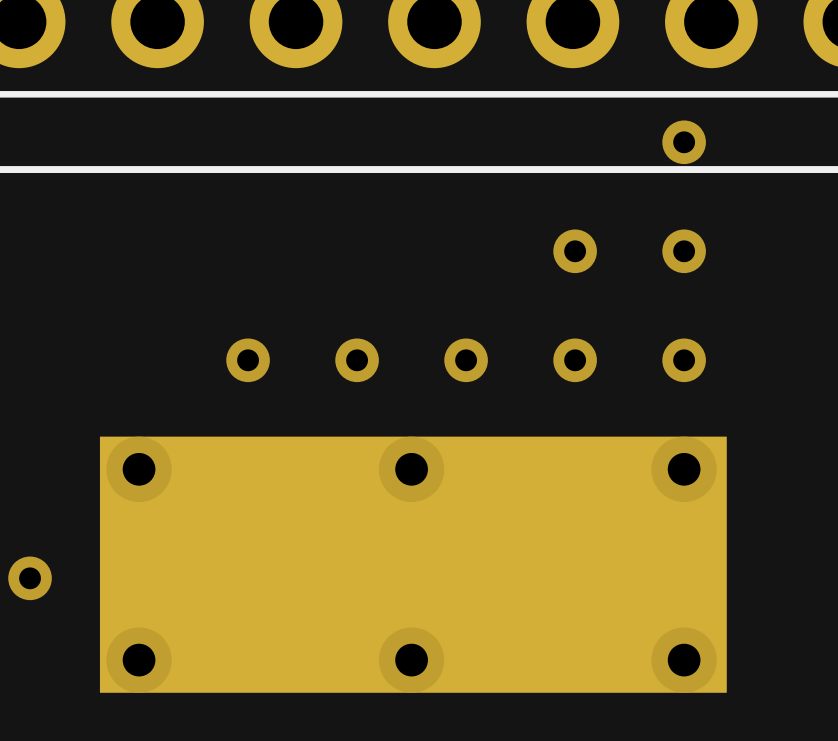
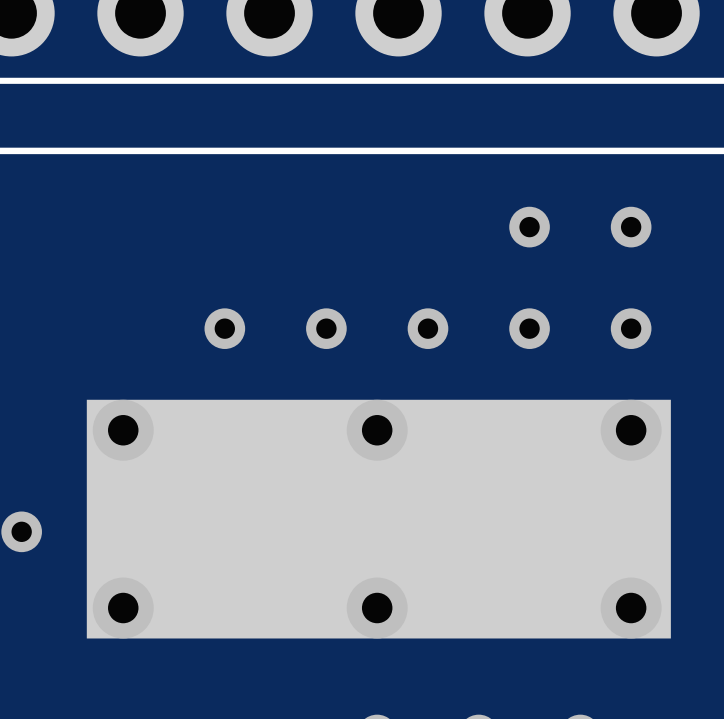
via: (684, 142) -> none

